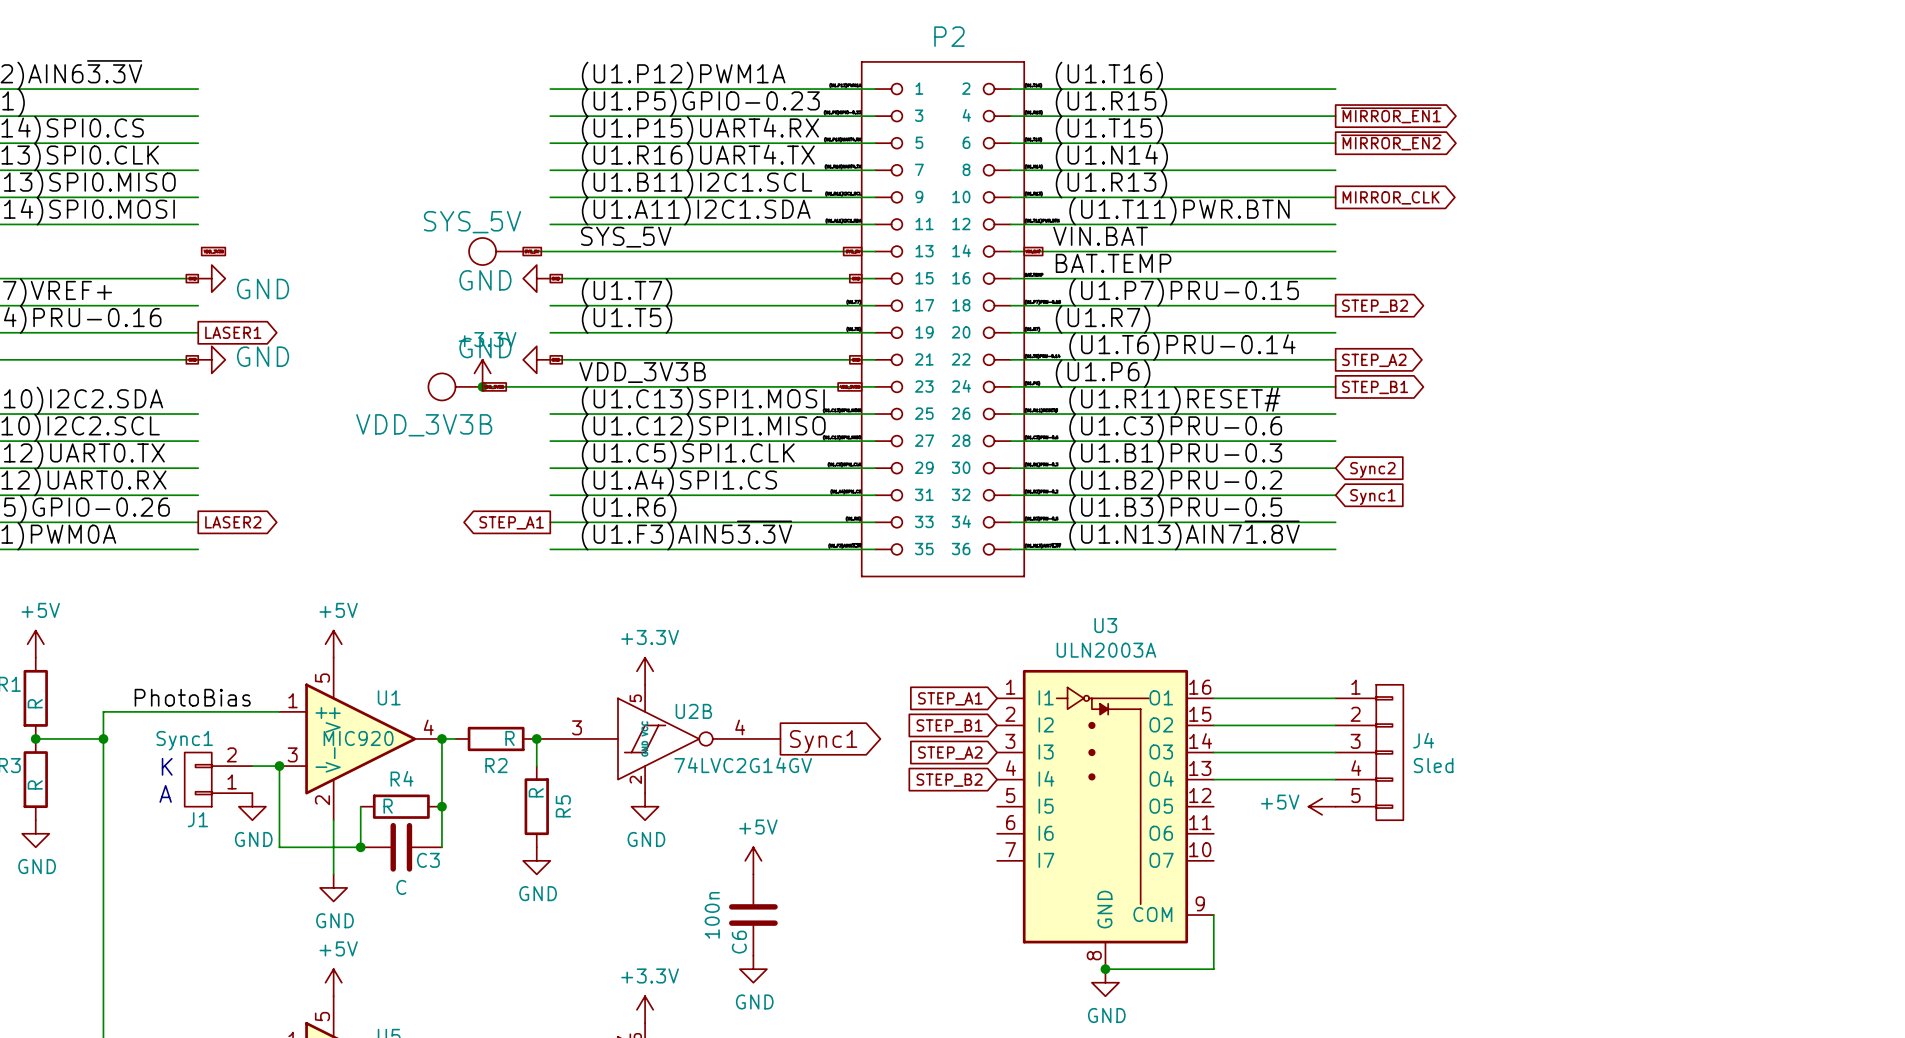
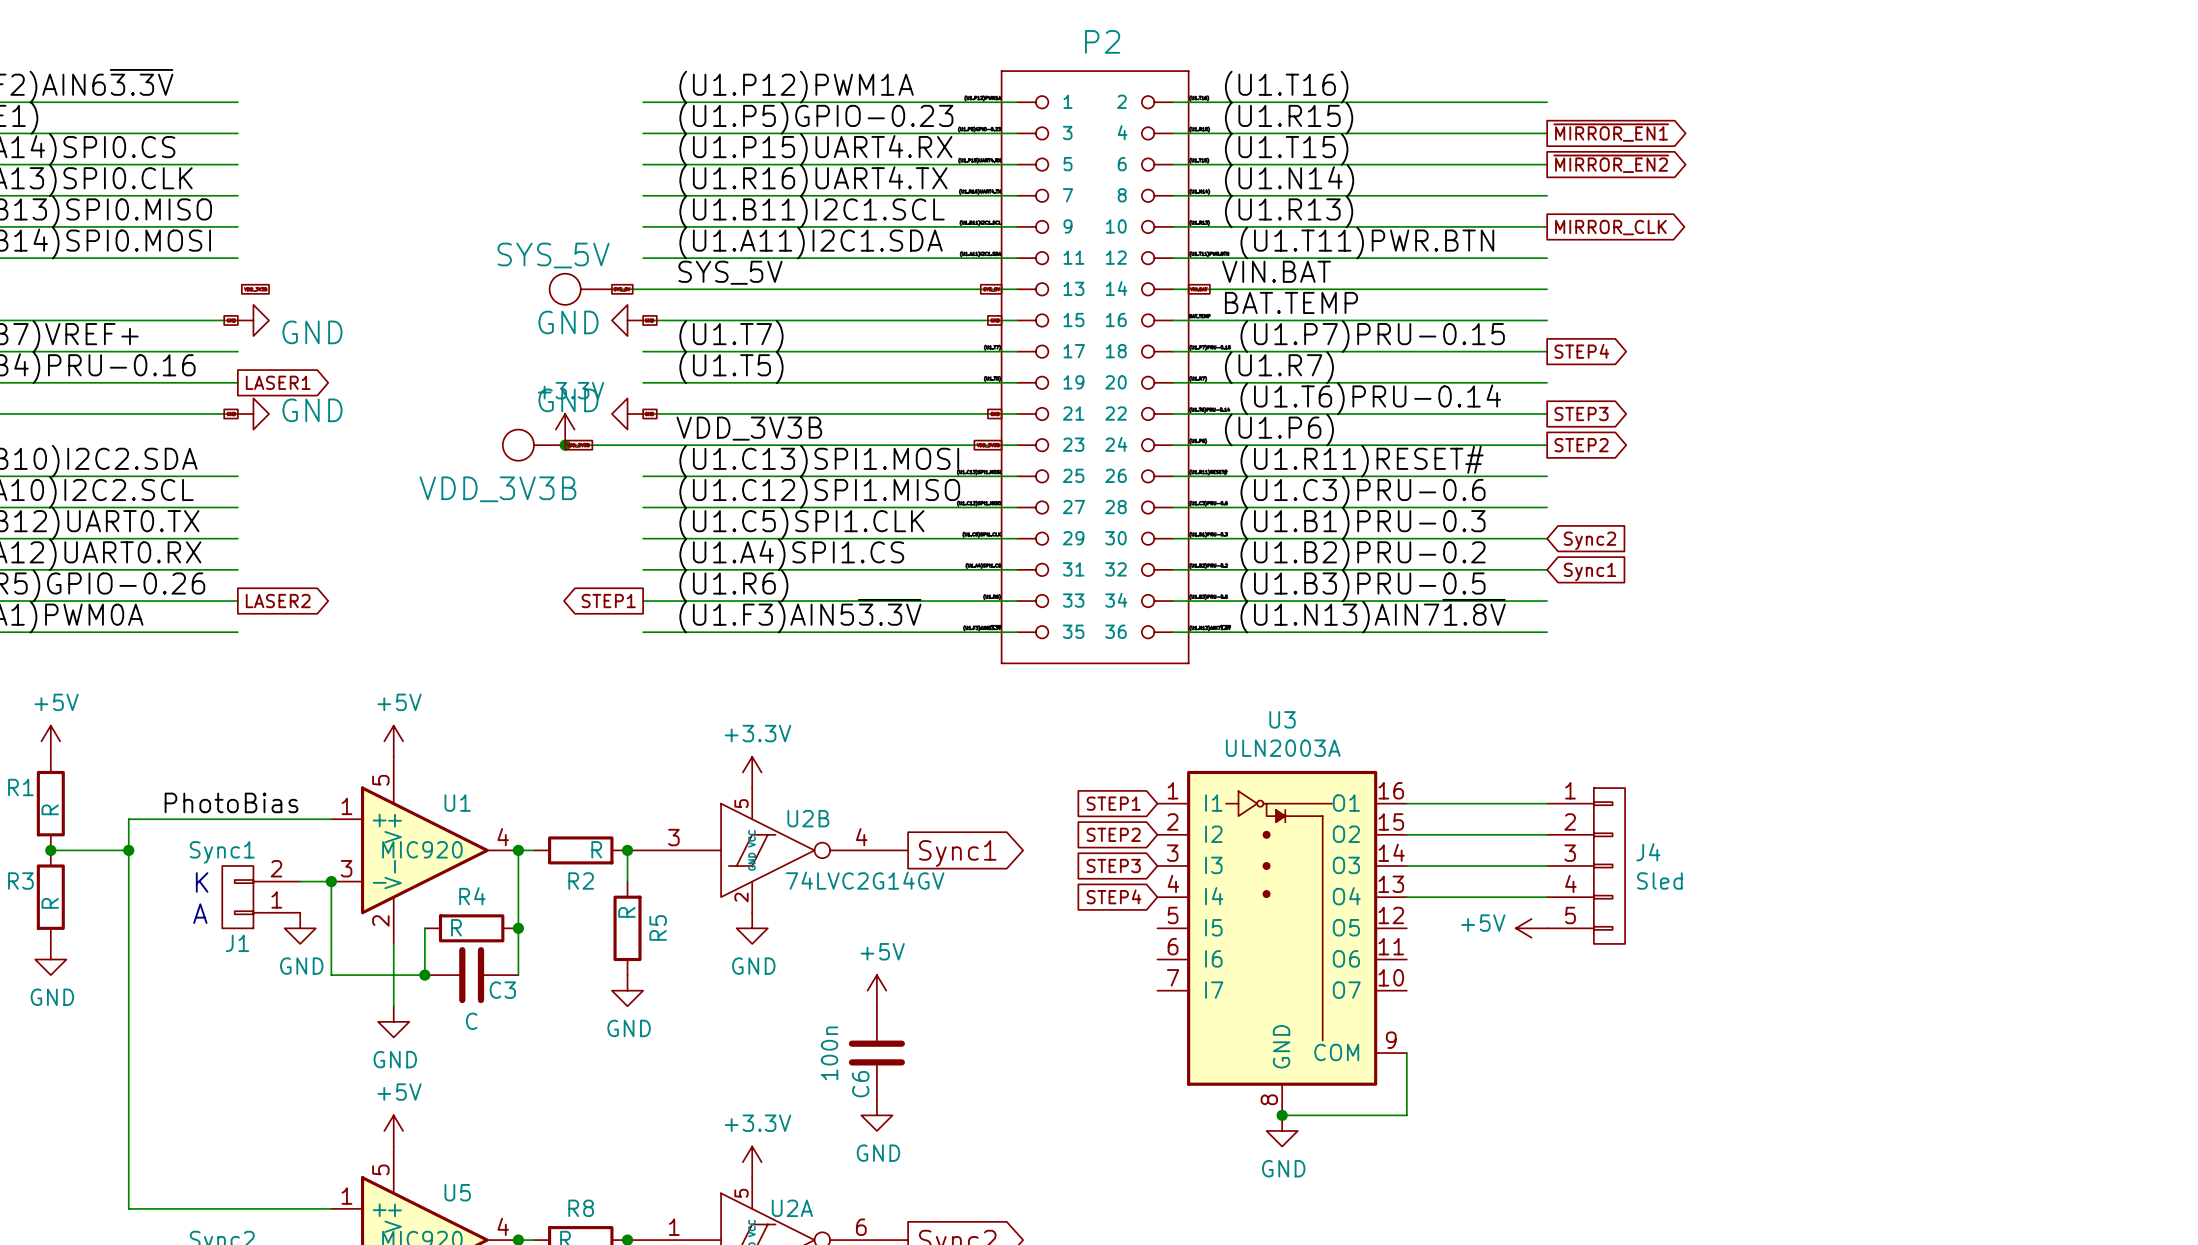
global label: STEP_B2 (1375, 306) -> STEP4 (1581, 351)
global label: STEP_A2 (1374, 360) -> STEP3 (1581, 413)
global label: STEP_B1 (1375, 387) -> STEP2 (1581, 445)
global label: STEP_A1 (511, 522) -> STEP1 (608, 601)
global label: STEP_A1 (950, 698) -> STEP1 (1113, 803)
global label: STEP_B1 (949, 725) -> STEP2 (1113, 834)
global label: STEP_A2 (950, 753) -> STEP3 (1113, 866)
global label: STEP_B2 (949, 780) -> STEP4 (1114, 896)

